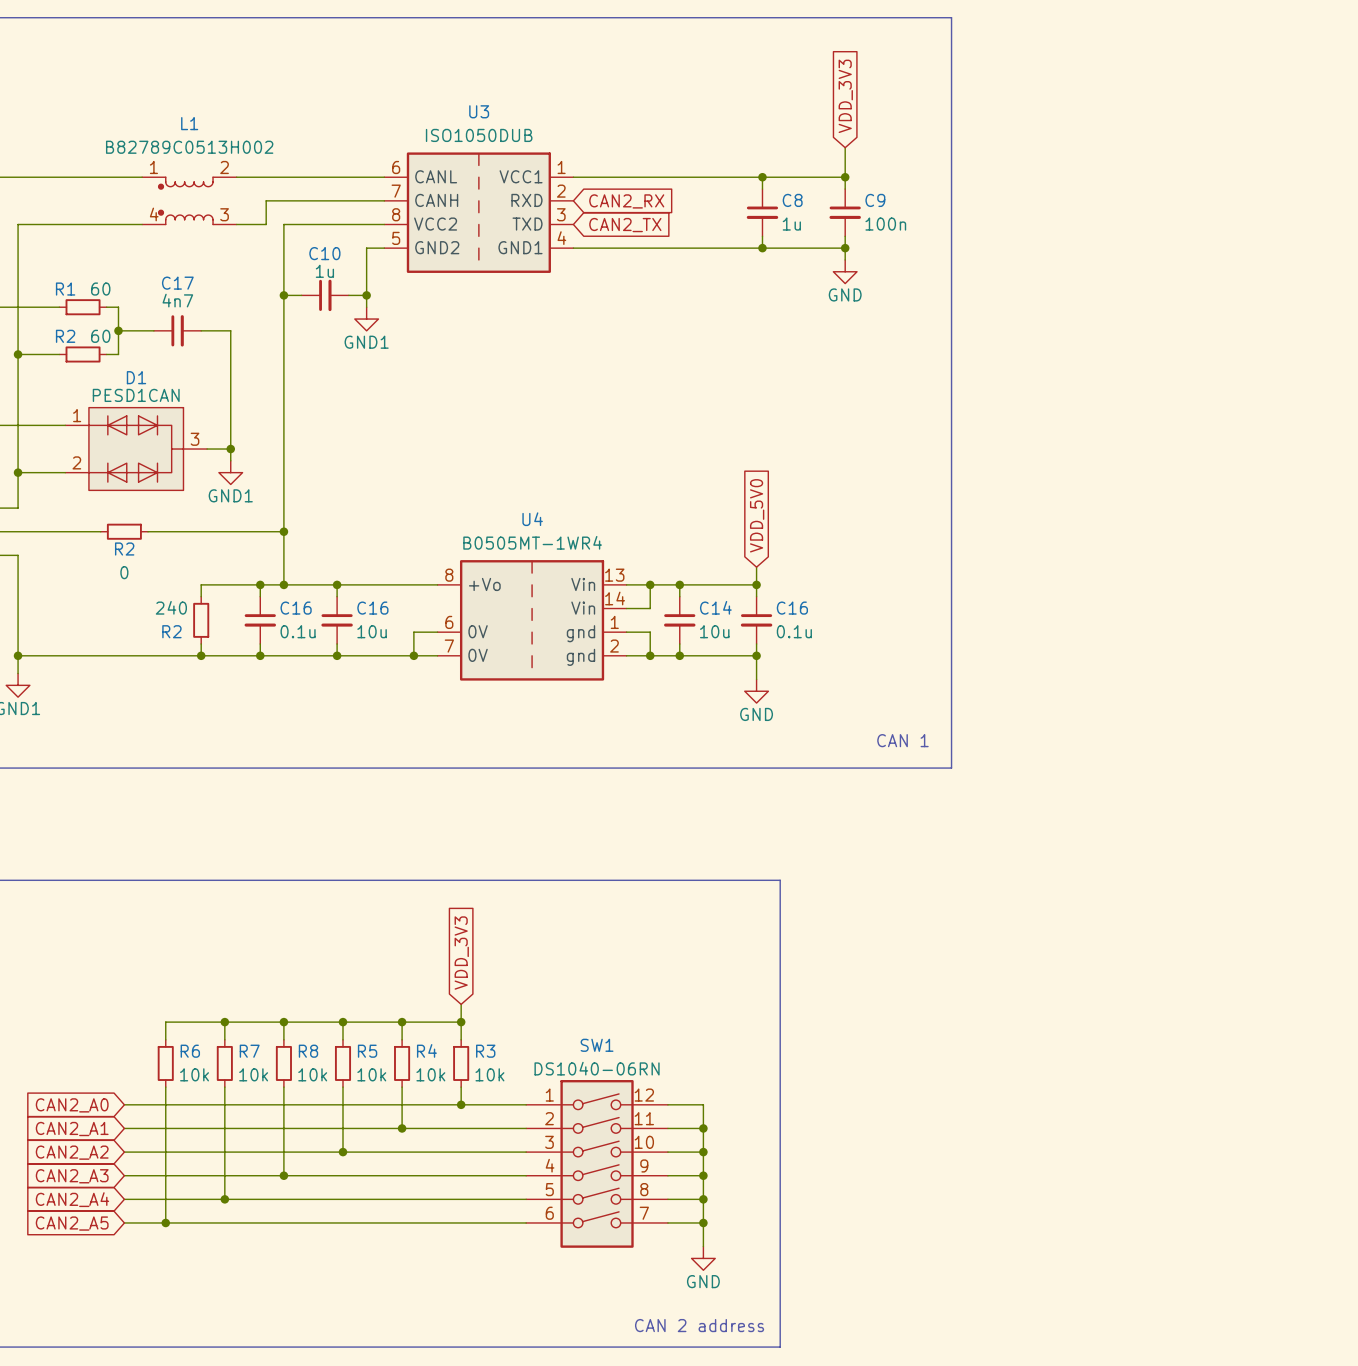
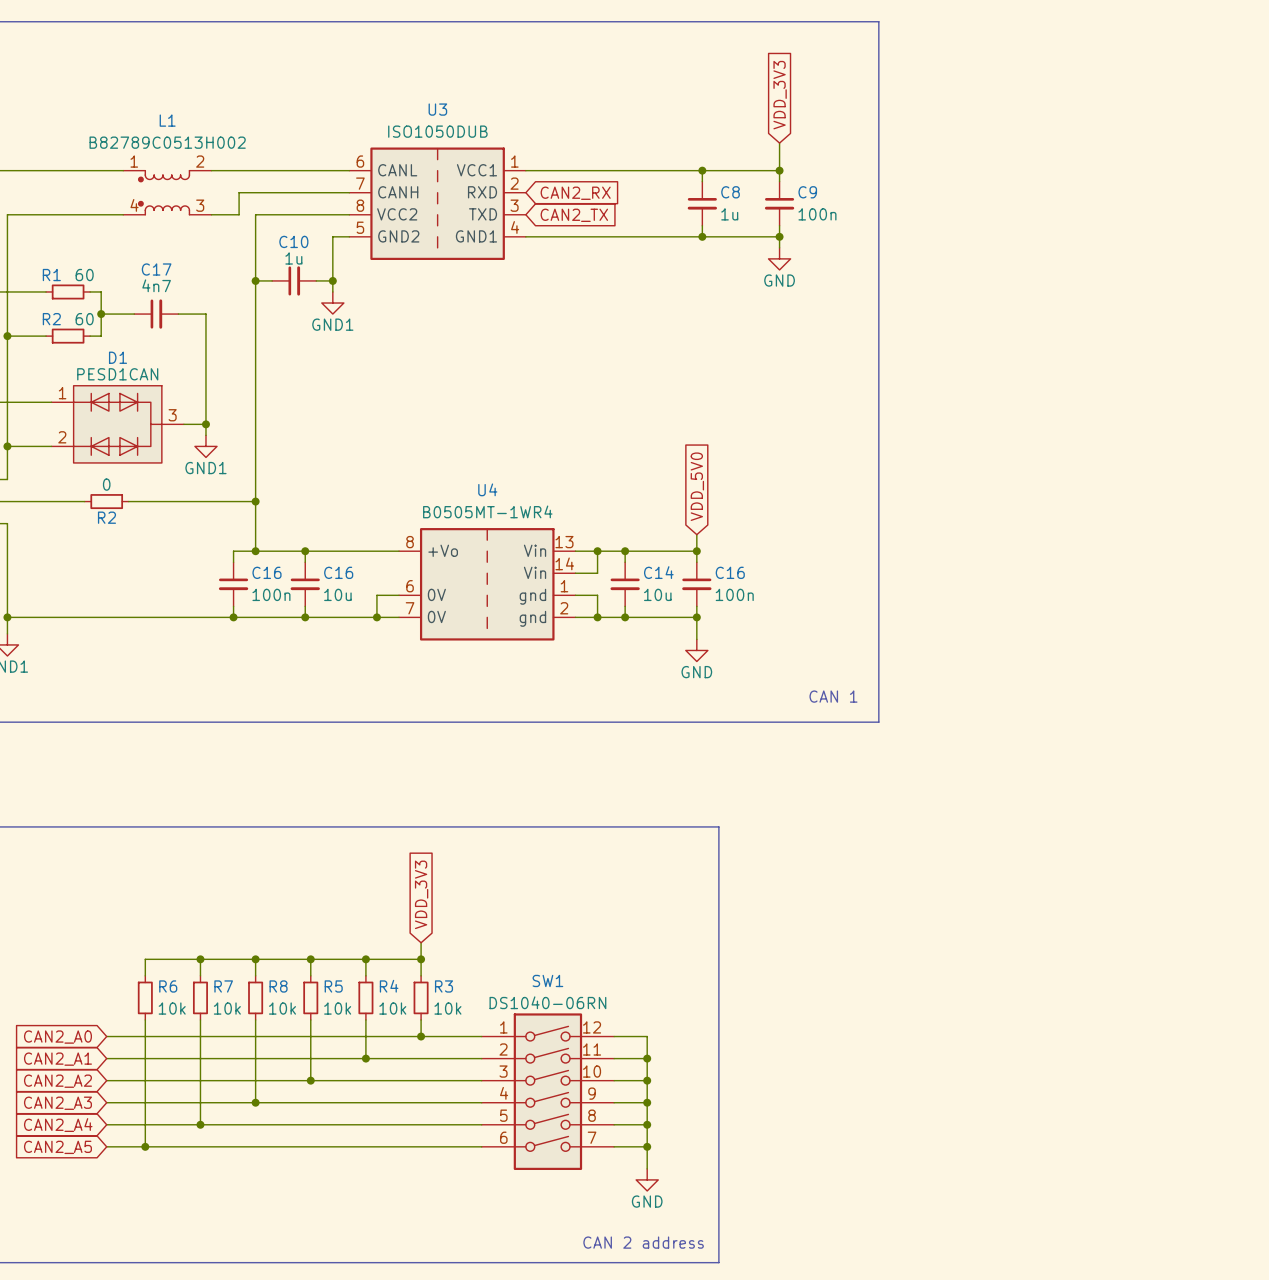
R2 value position: 0 (124, 572) -> 0 (106, 484)
wire: (260, 584) (201, 584) (201, 596) -> none
junction: (260, 584) -> none
R2: 240 (201, 620) -> none
C16 value: 0.1u (298, 631) -> 100n (271, 594)
C16 value: 0.1u (794, 631) -> 100n (734, 594)
wire: (201, 643) (201, 655) -> none
junction: (201, 655) -> none

